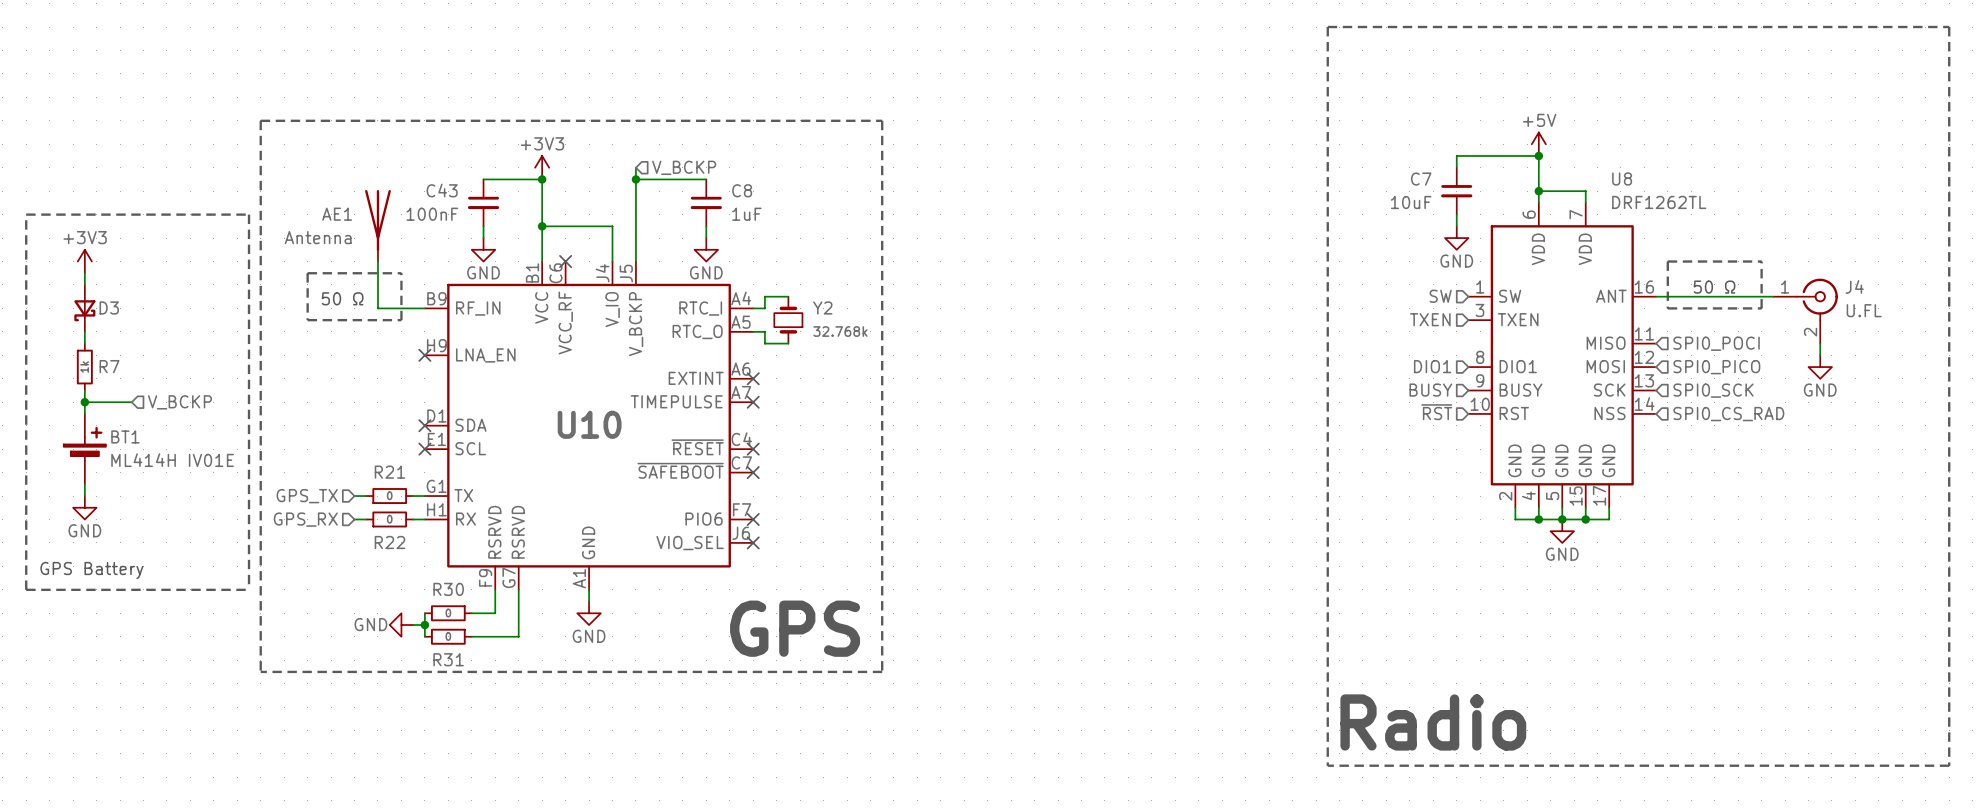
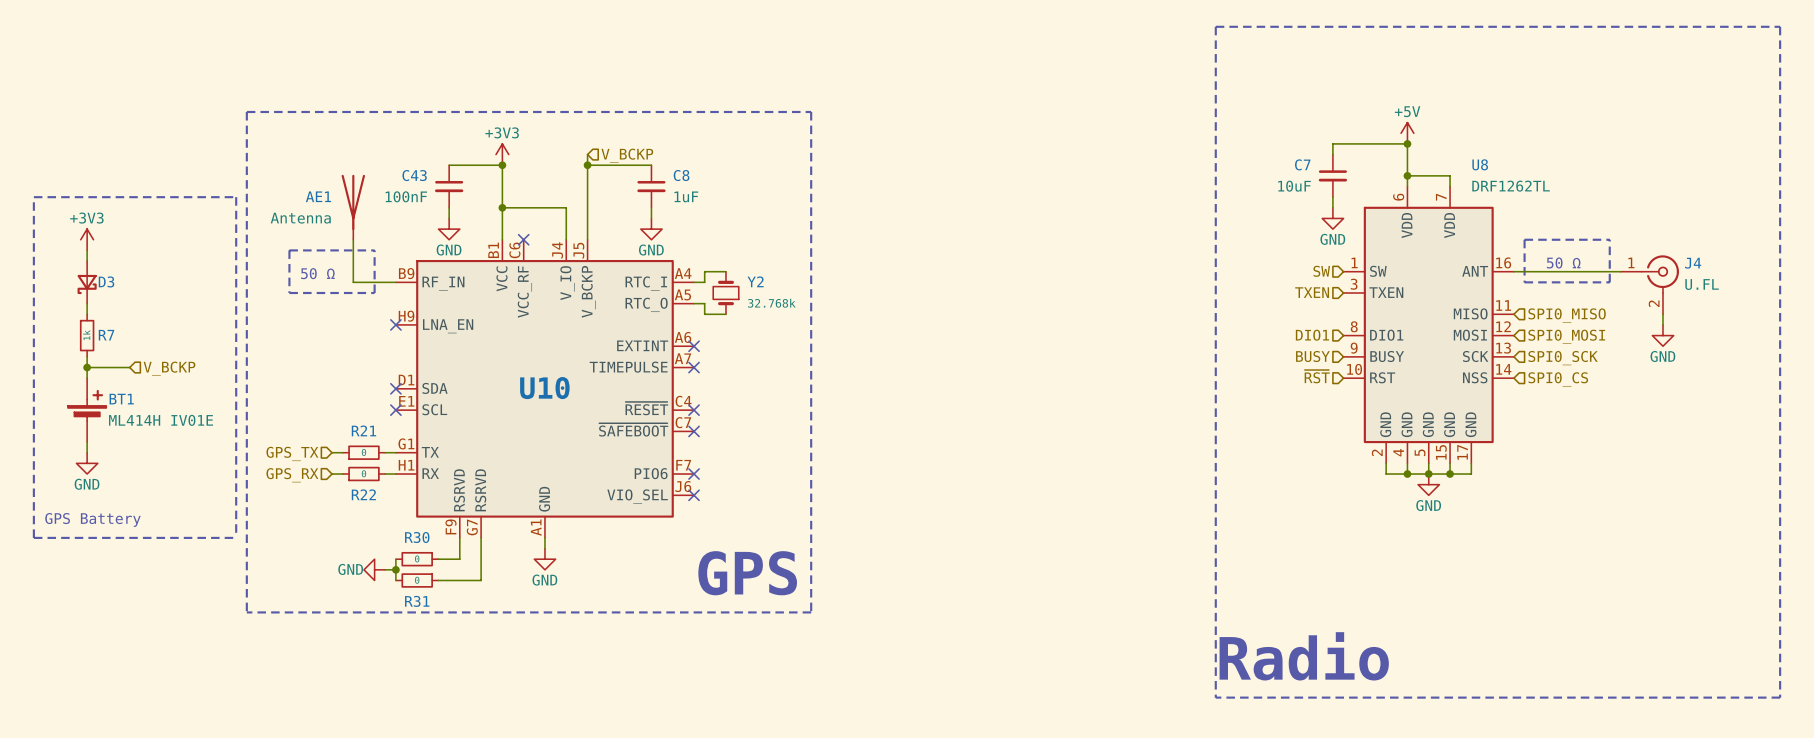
hierarchical label: SPI0_POCI (1716, 343) -> SPI0_MISO (1567, 315)
hierarchical label: SPI0_PICO (1716, 367) -> SPI0_MOSI (1566, 336)
hierarchical label: SPI0_CS_RAD (1728, 414) -> SPI0_CS (1558, 379)

